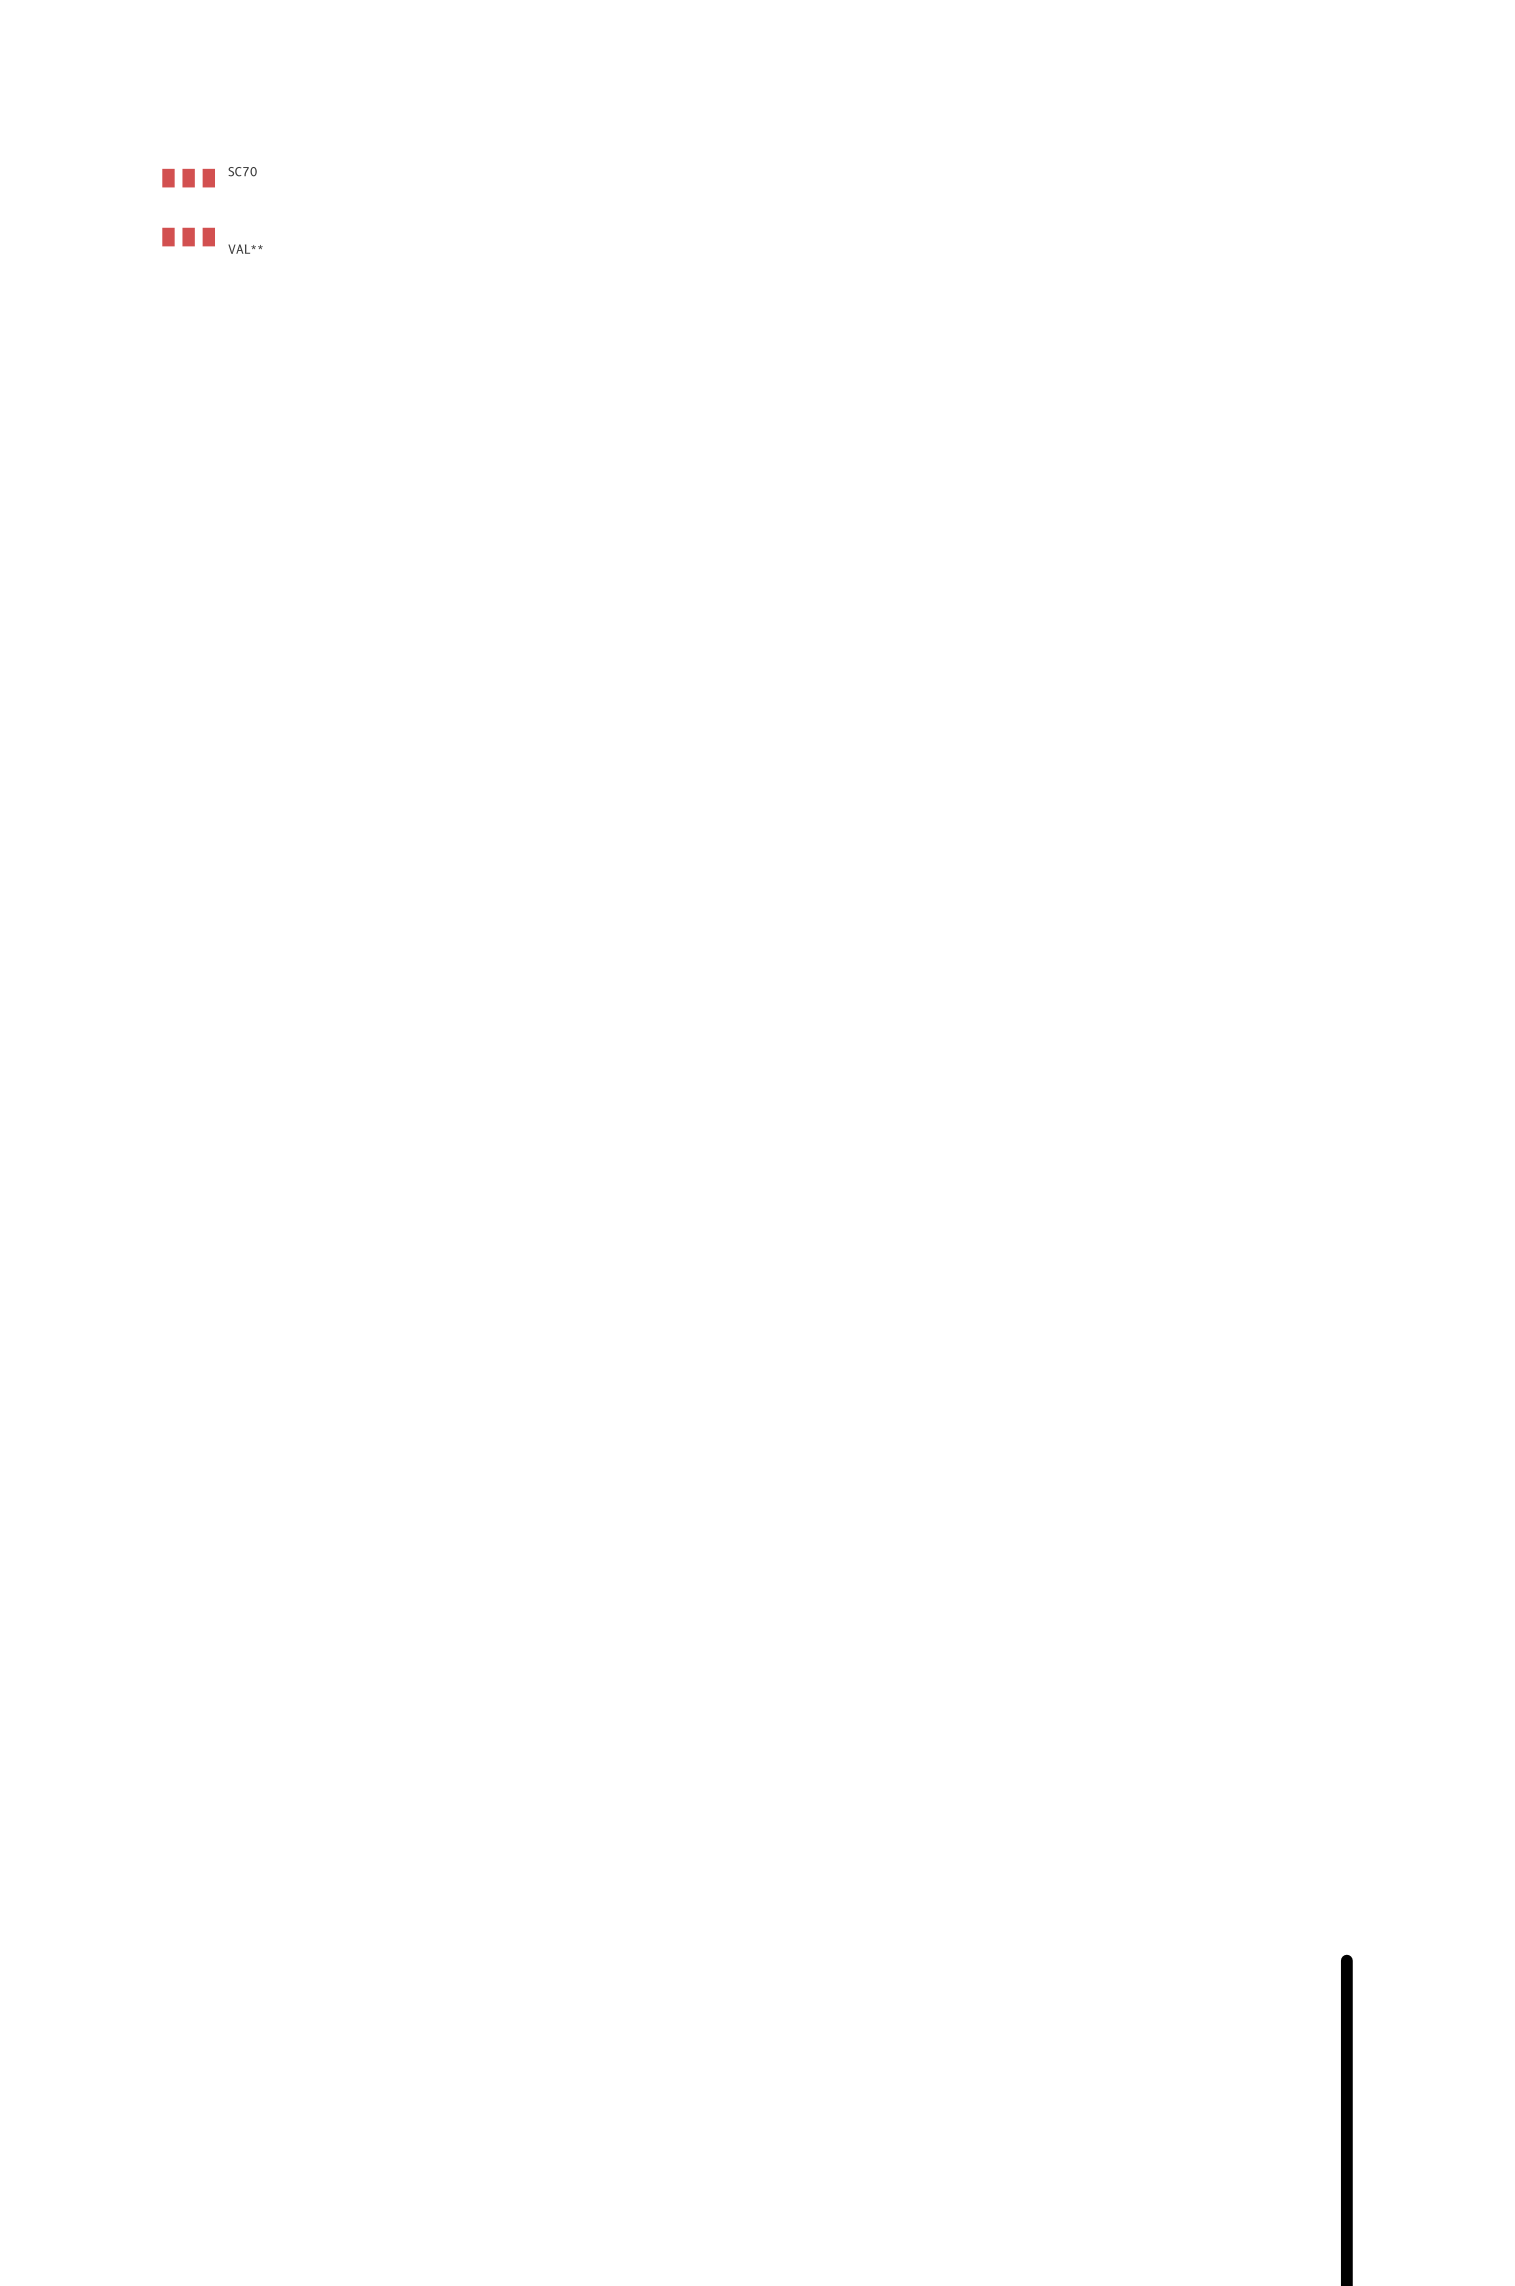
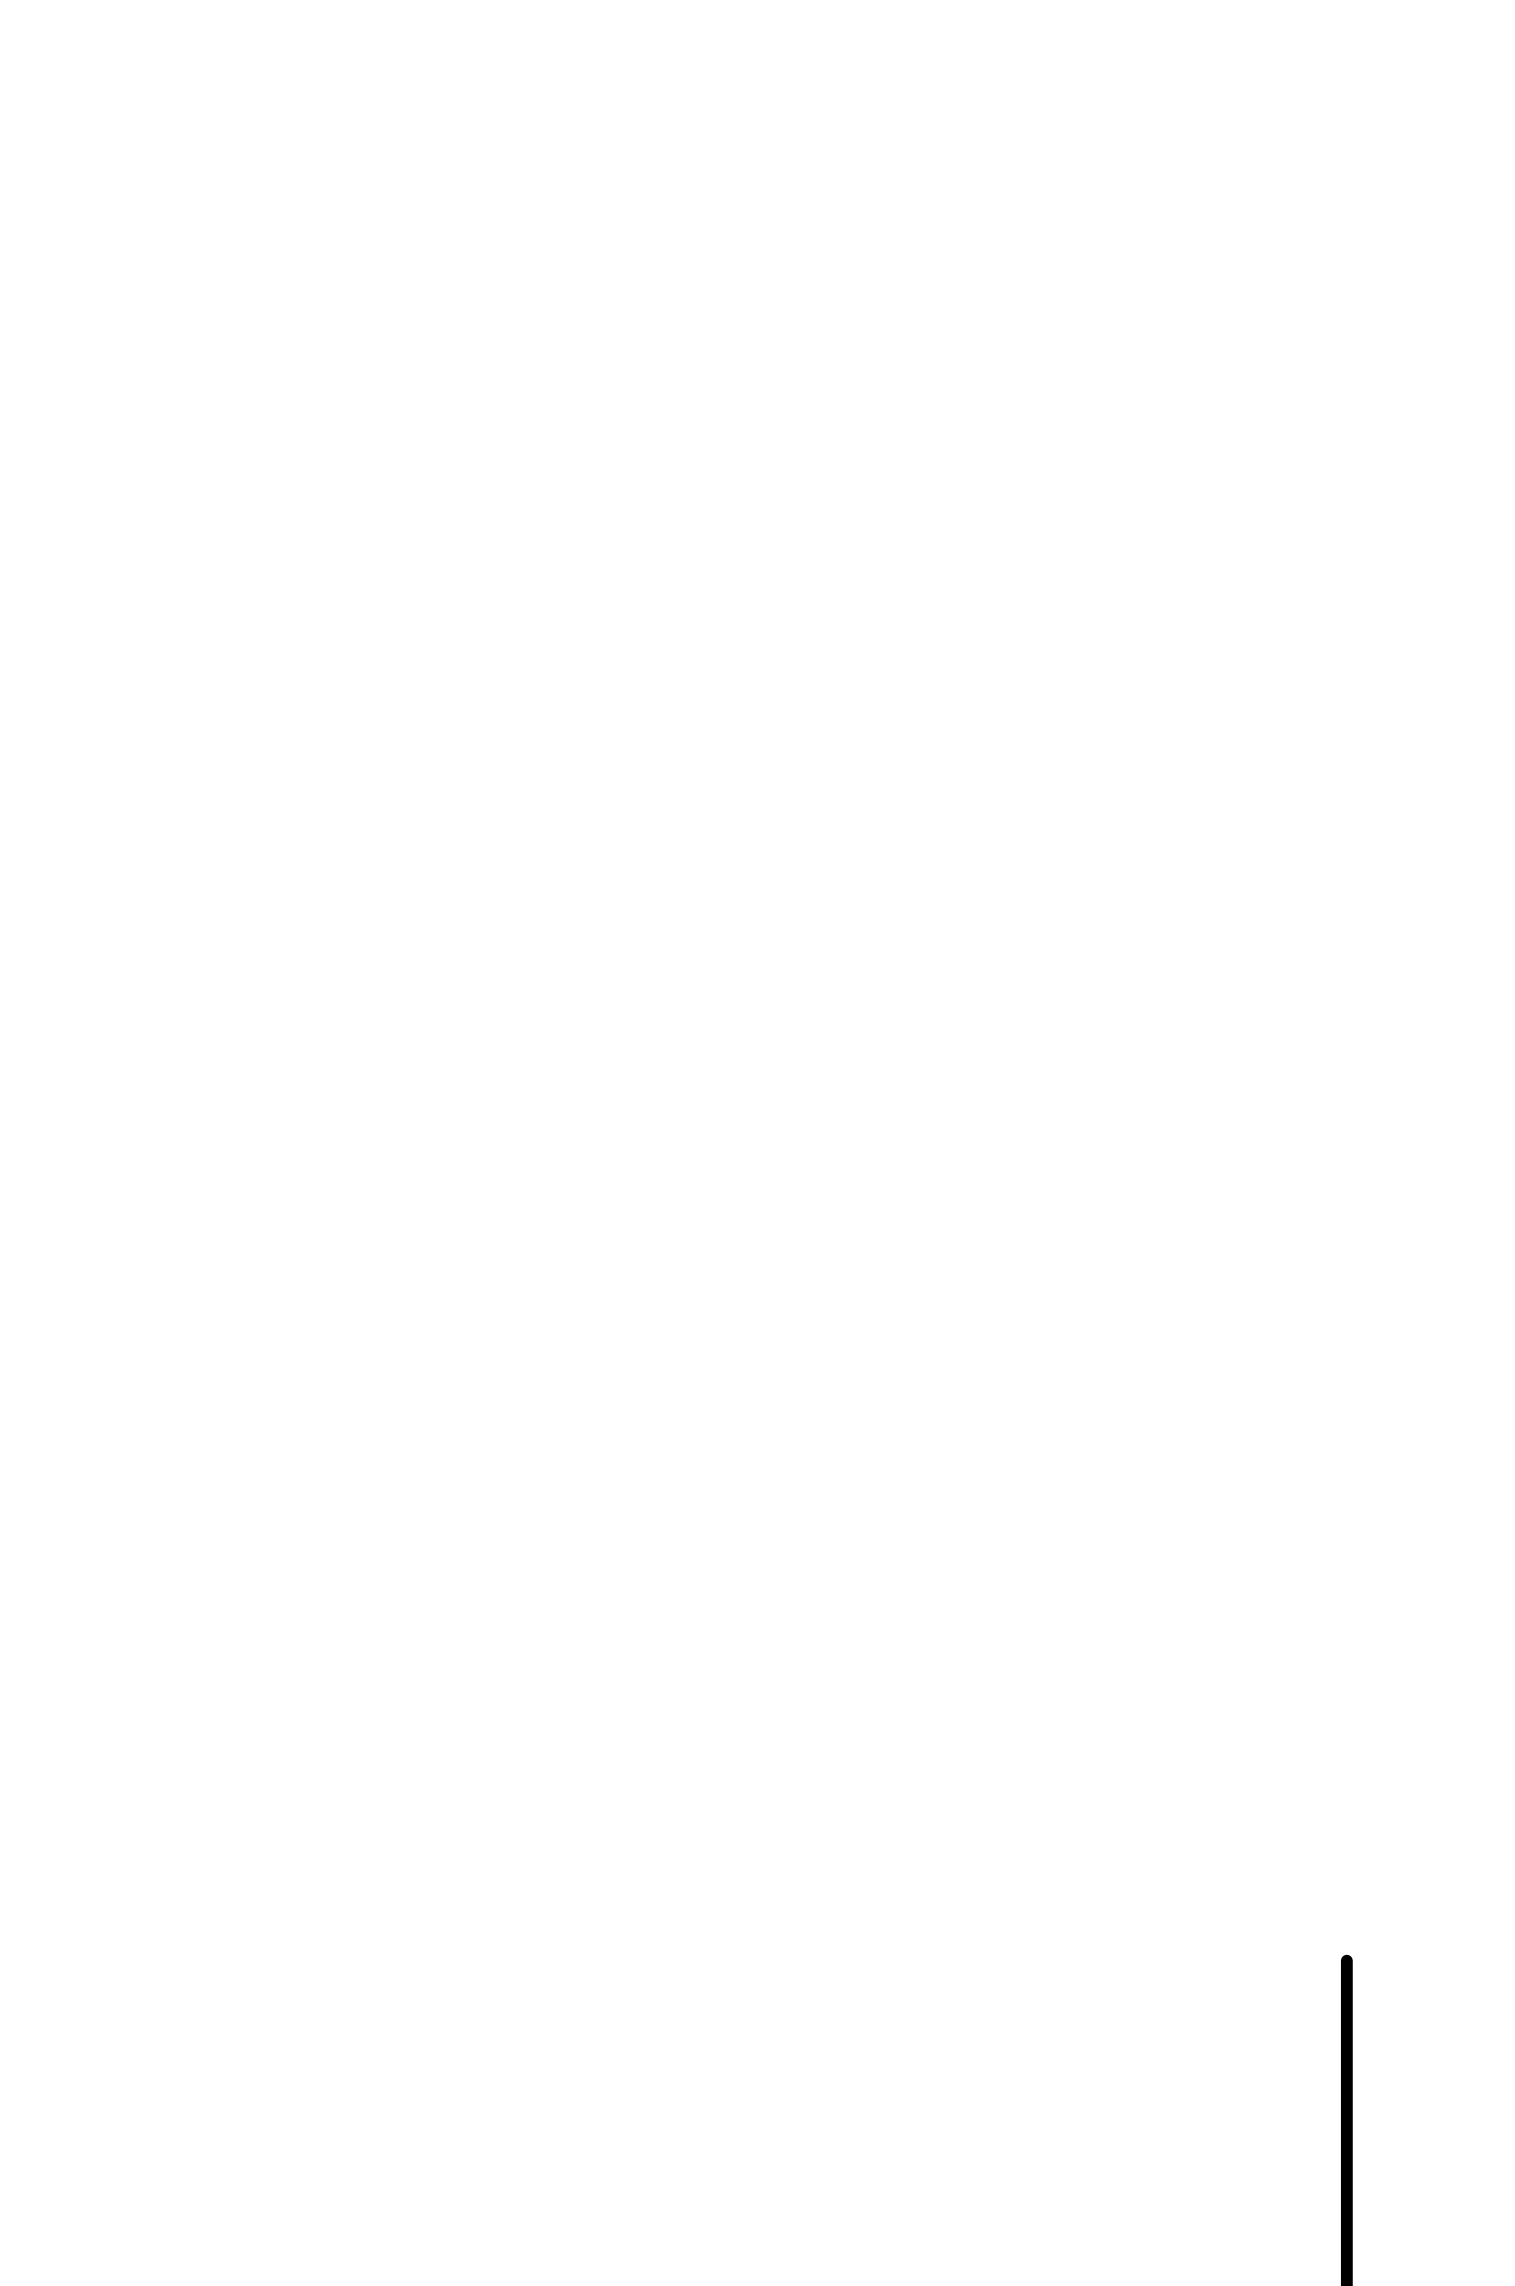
SC70: VAL** (188, 207) -> none

